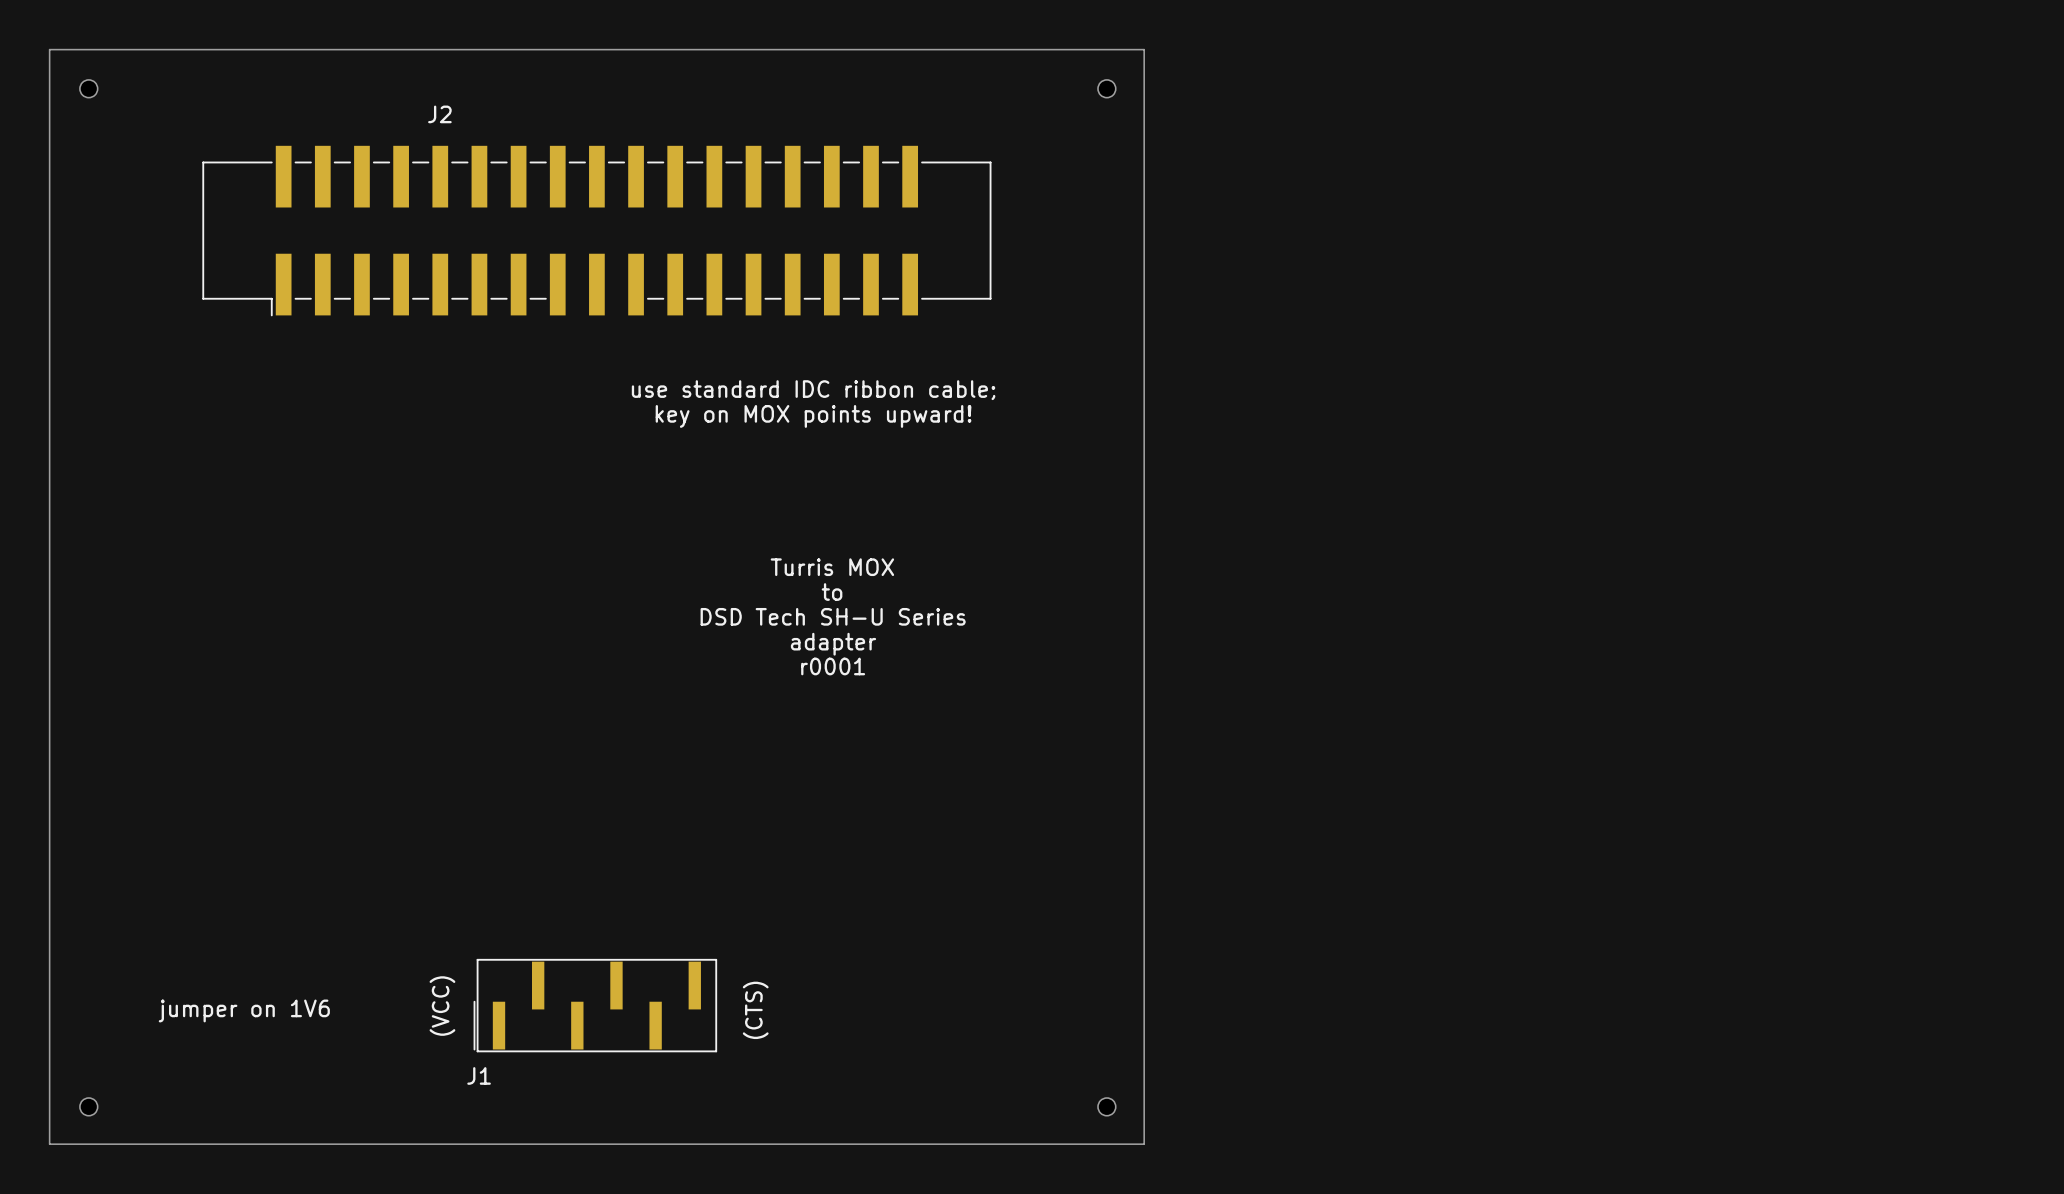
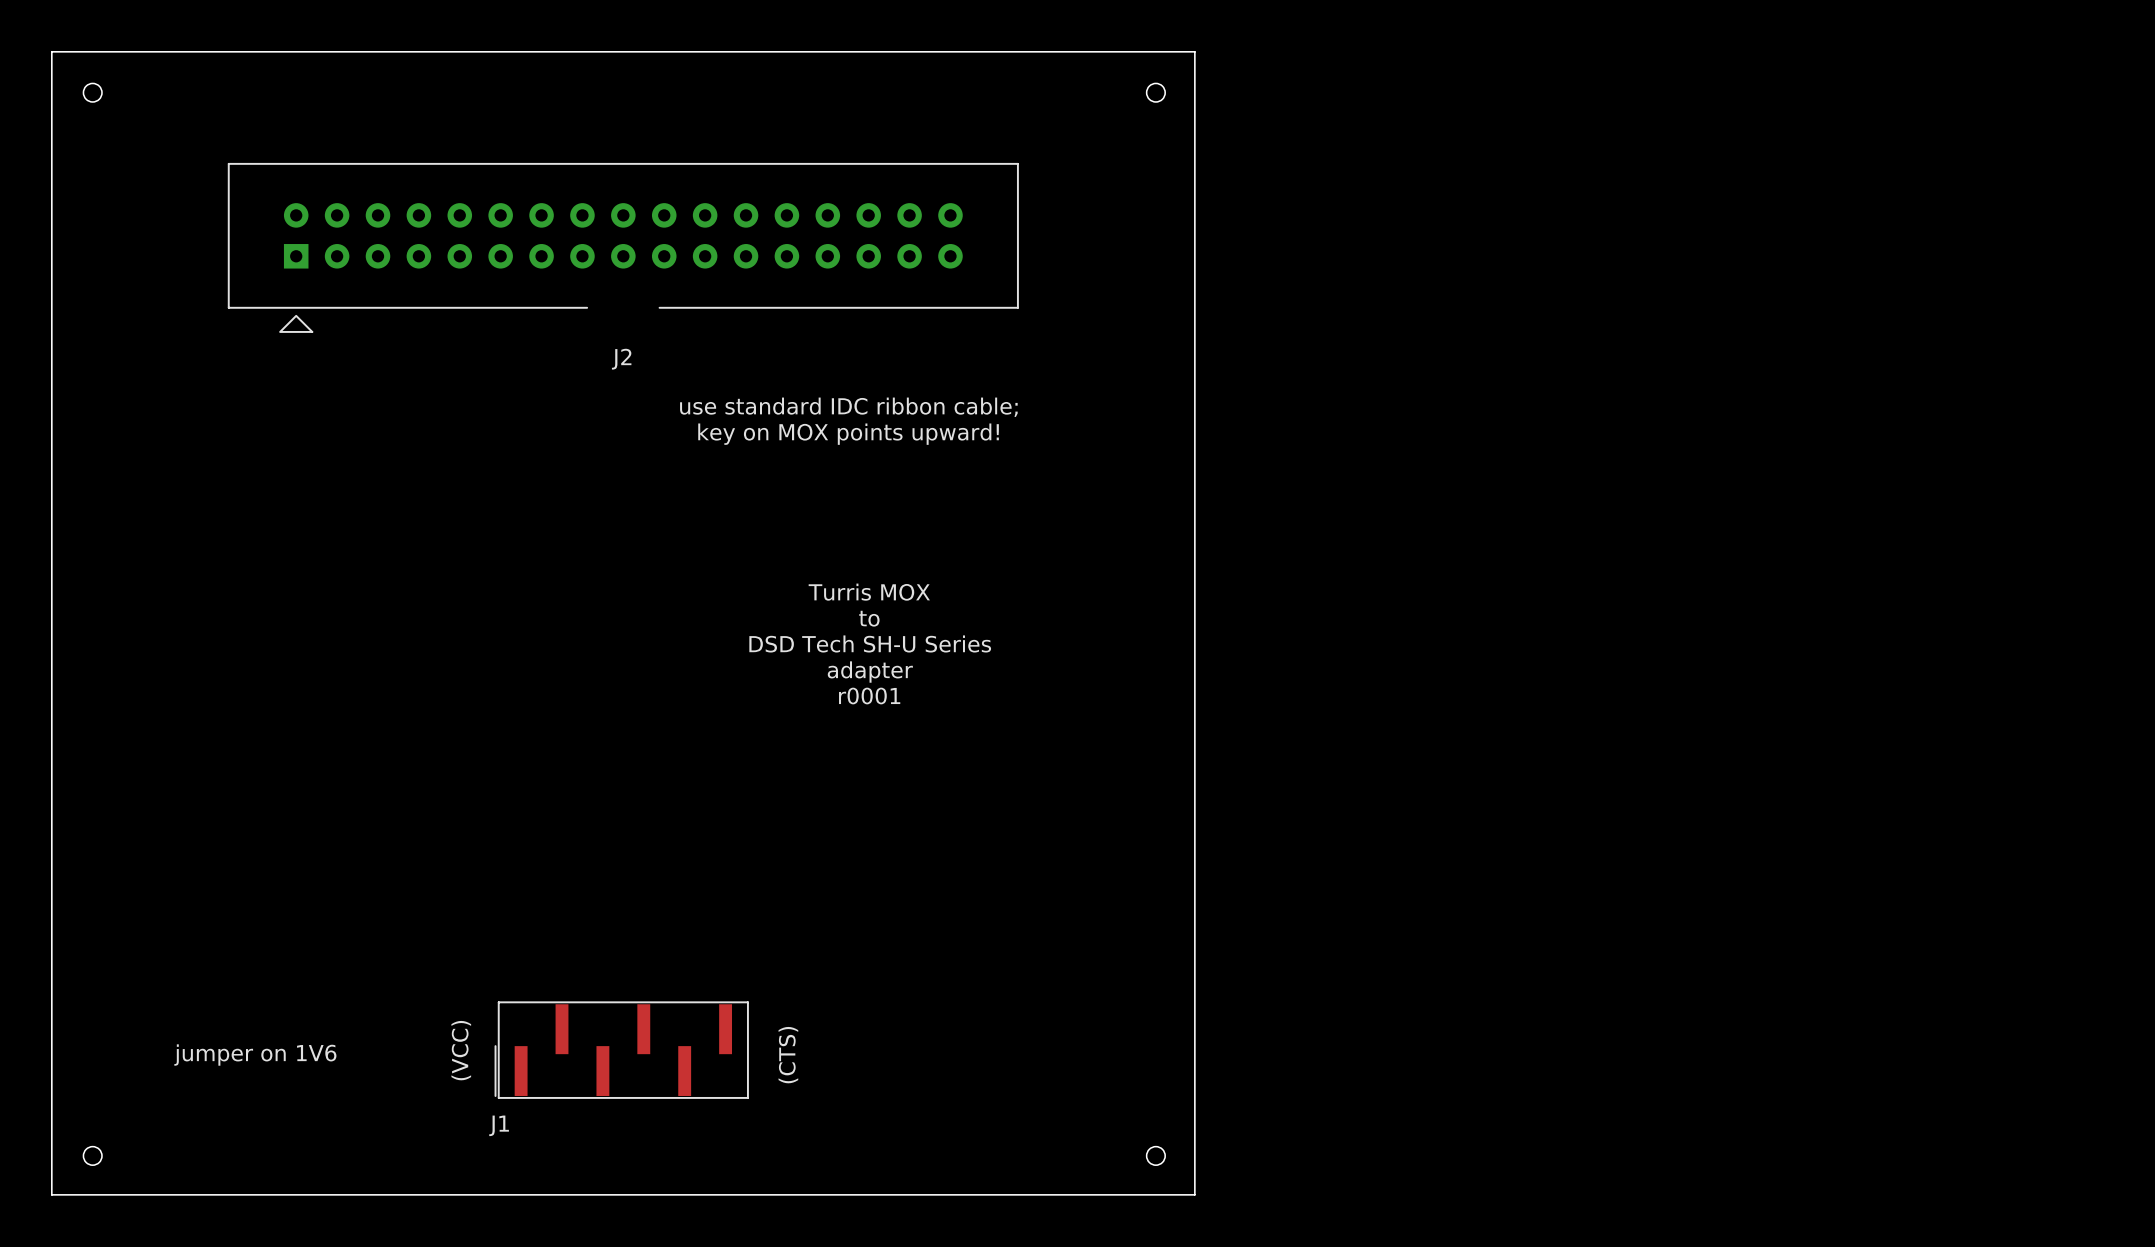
J2 name position: J2 (439, 114) -> J2 (621, 359)
J2 footprint: [202, 145, 992, 317] -> [227, 162, 1019, 333]

